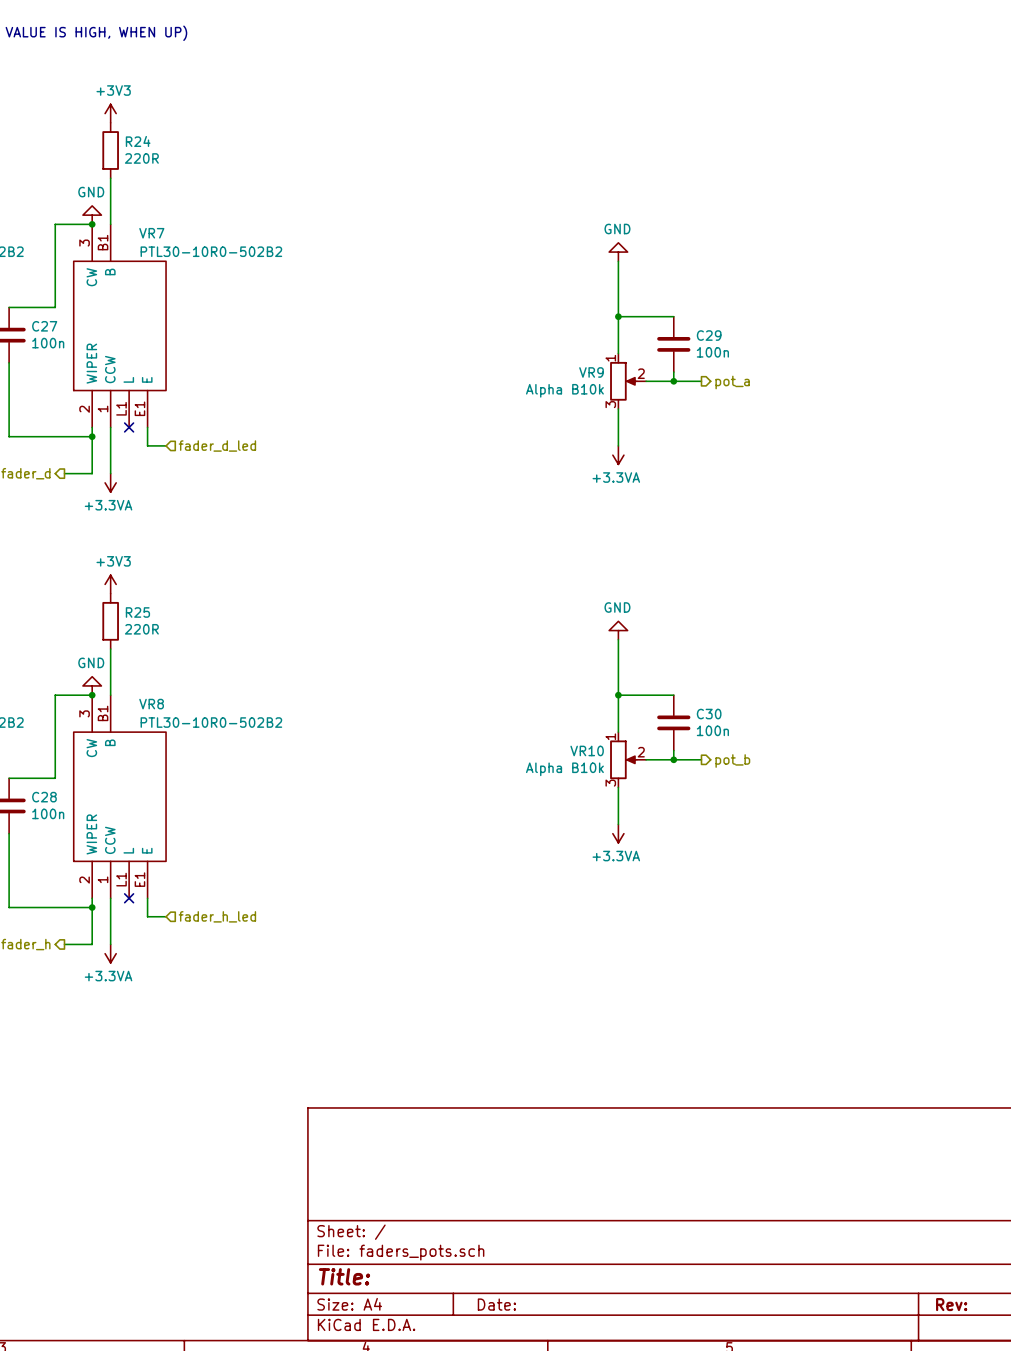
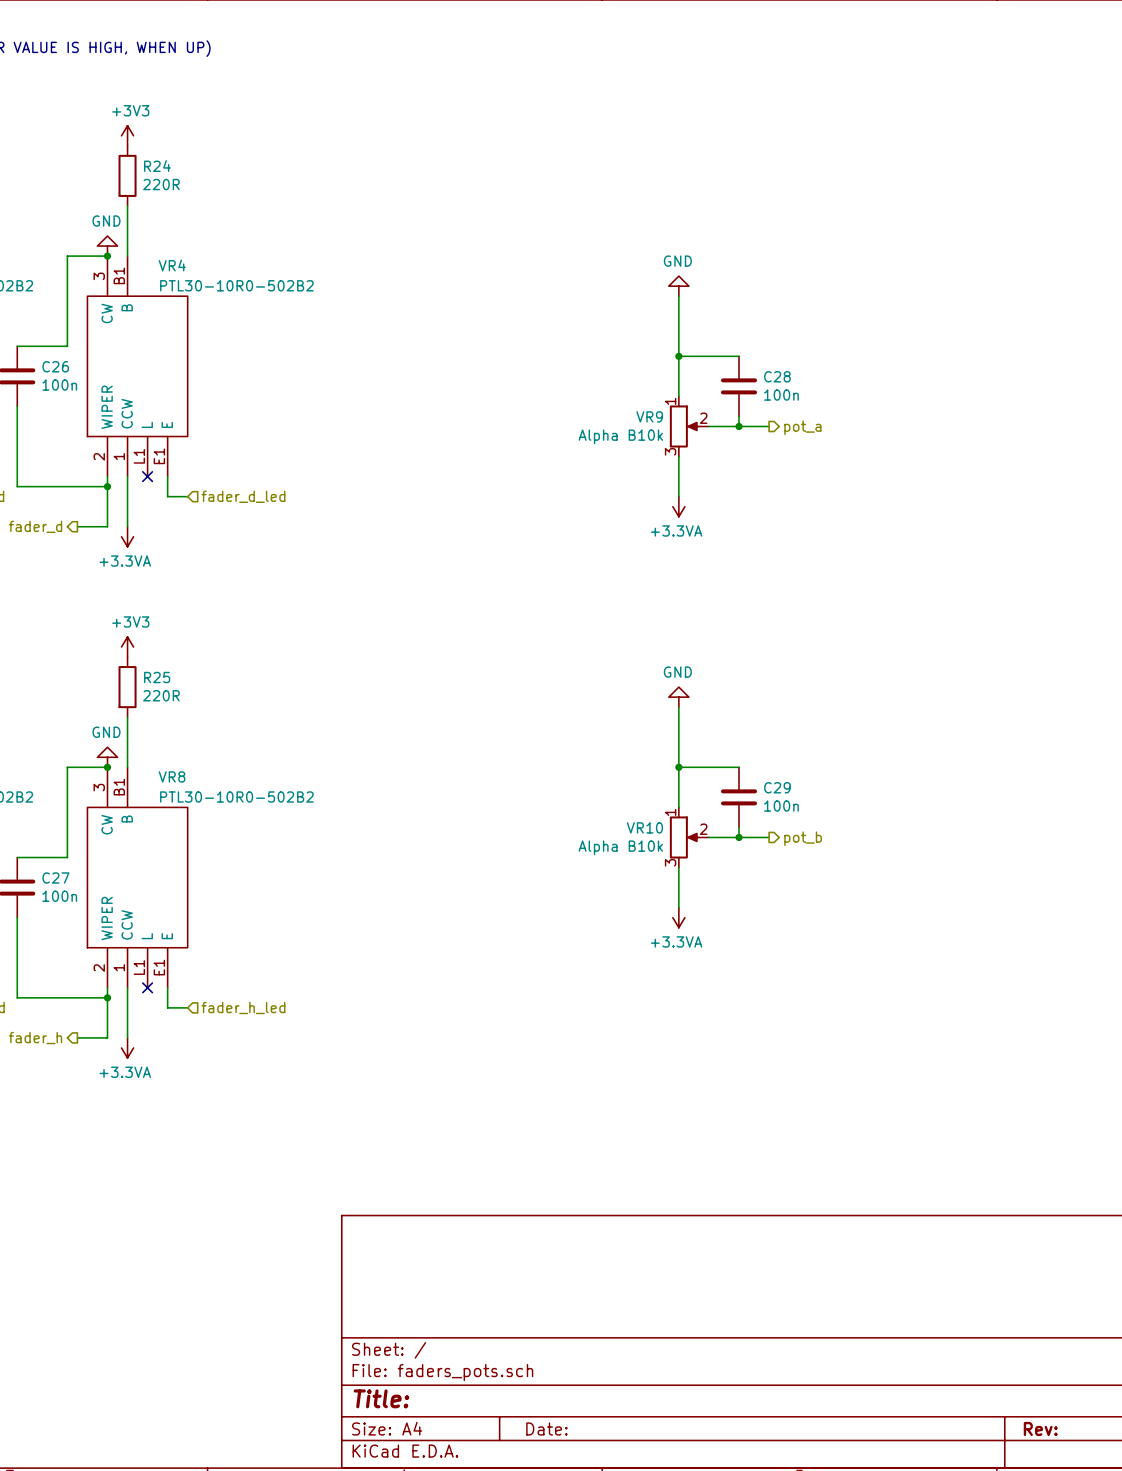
VR7 name: VR7 (151, 233) -> VR4 (172, 265)
C27 name: C27 (44, 326) -> C26 (55, 366)
C29 name: C29 (709, 335) -> C28 (777, 376)
C30 name: C30 (709, 714) -> C29 (777, 787)
C28 name: C28 (44, 797) -> C27 (55, 878)

